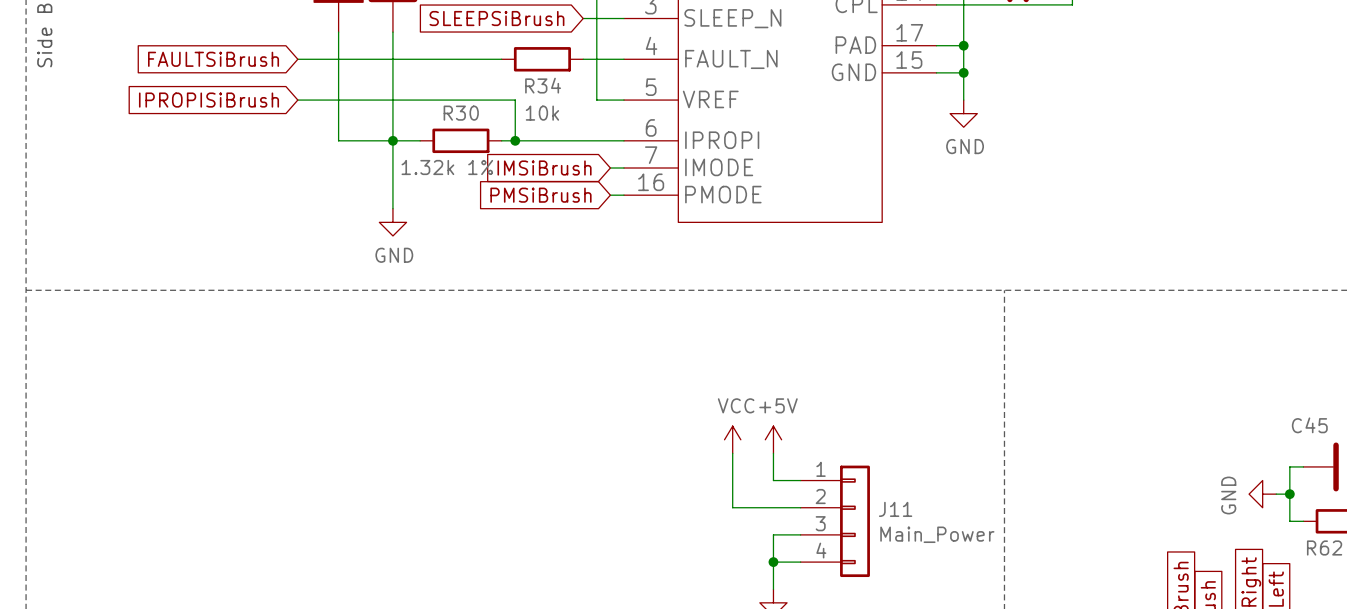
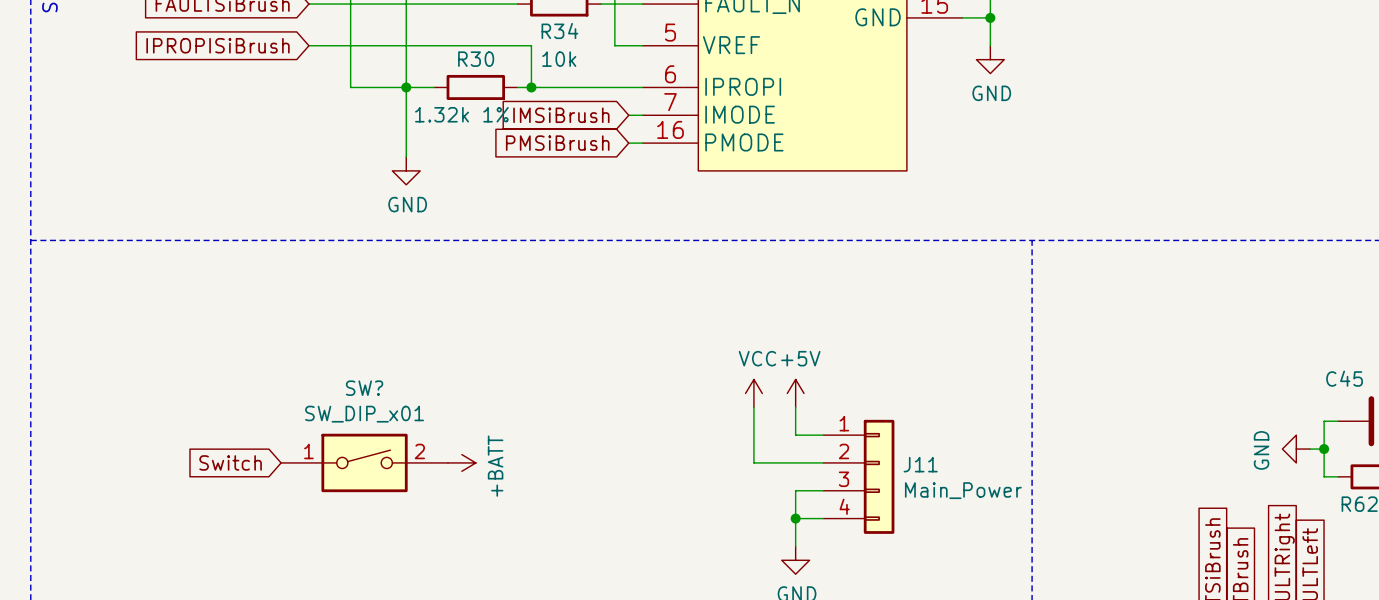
global label: none -> Switch (230, 462)
SW?: none -> SW_DIP_x01 (364, 462)
power symbol: none -> +BATT (461, 462)

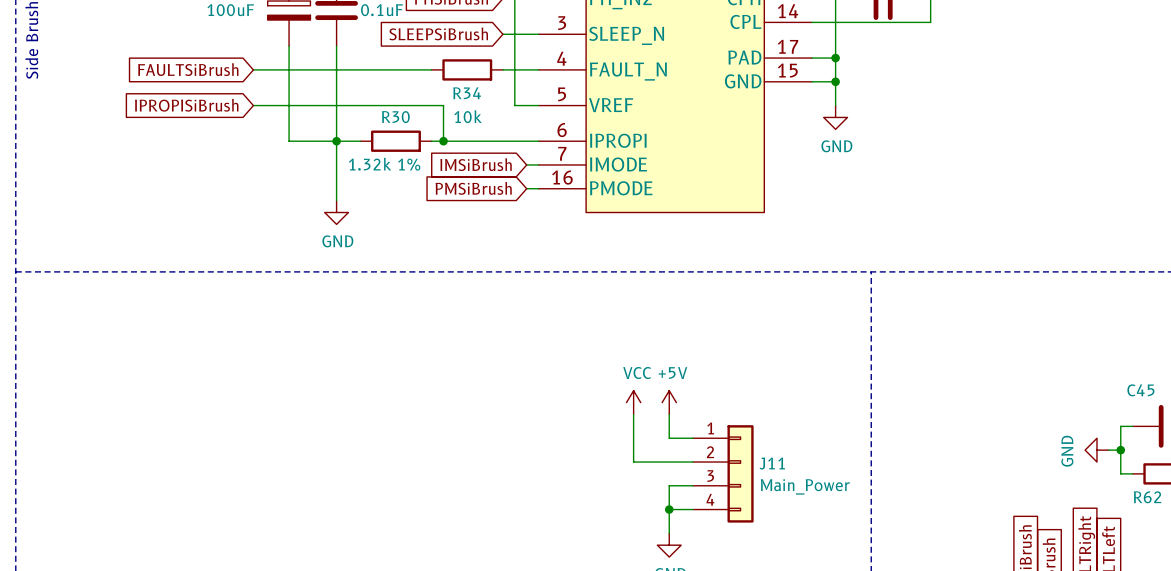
global label: Switch (230, 462) -> none
SW?: SW_DIP_x01 (364, 462) -> none
power symbol: +BATT (461, 462) -> none

